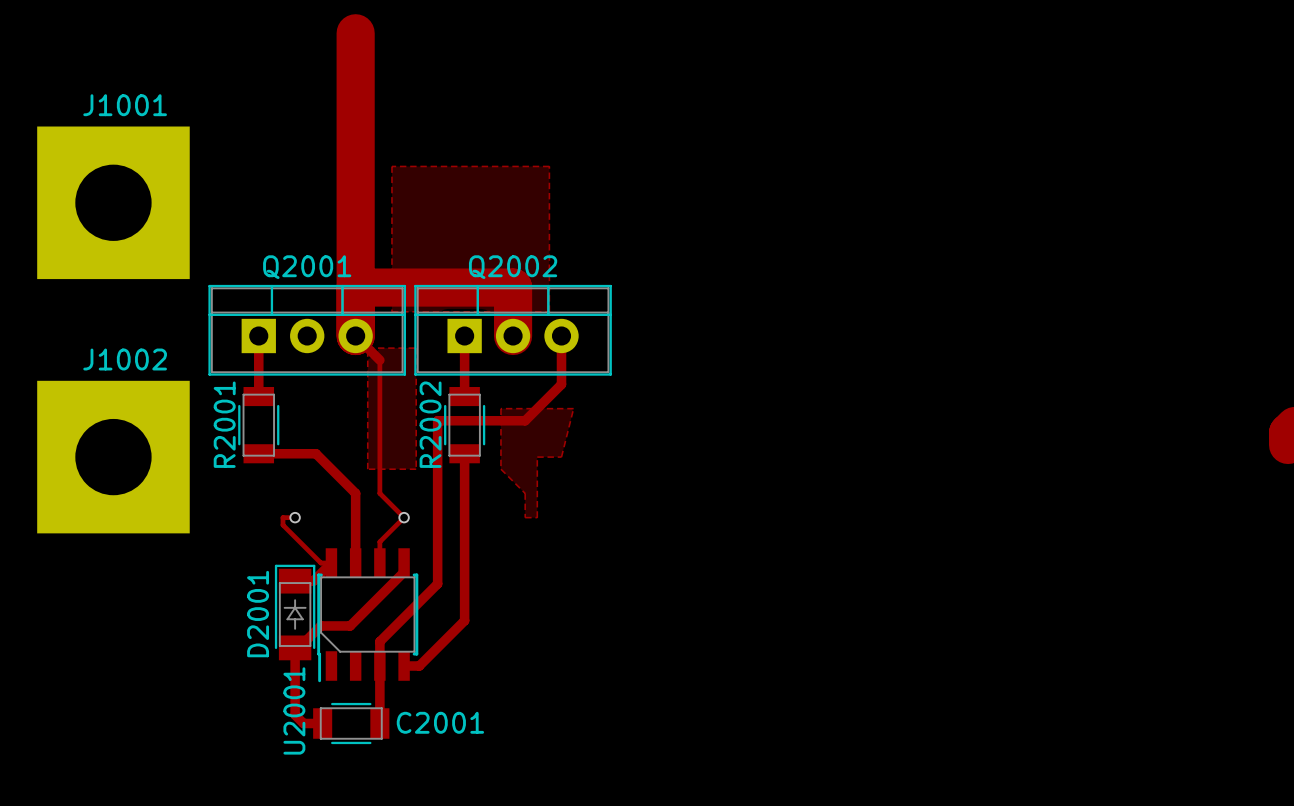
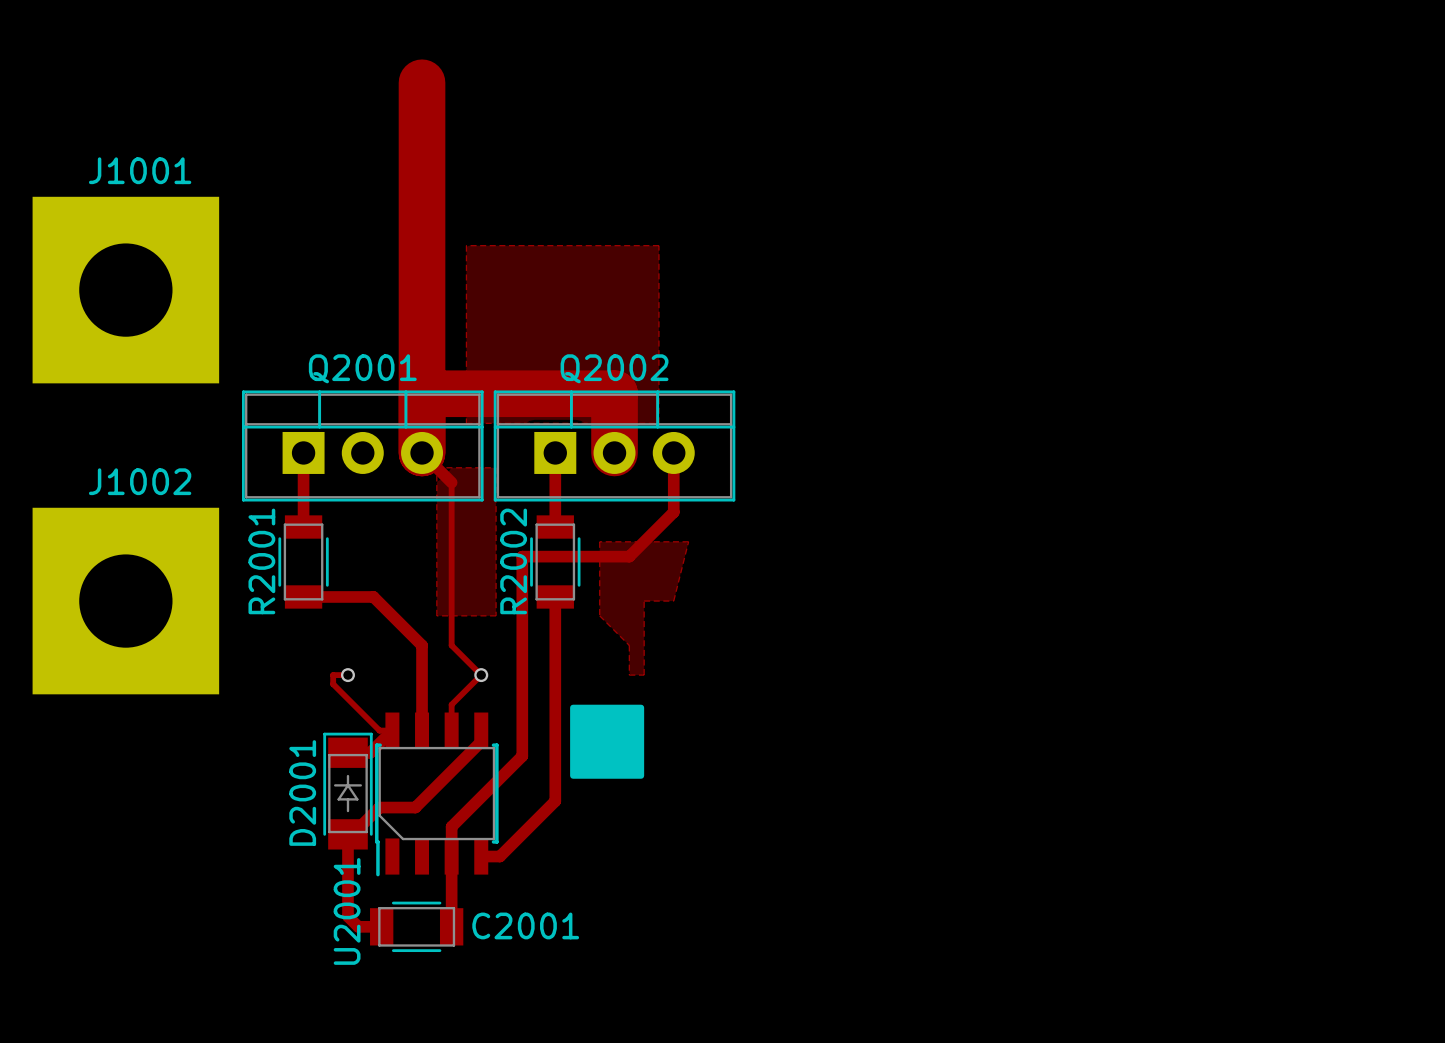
drawing: none -> [570, 704, 645, 779]

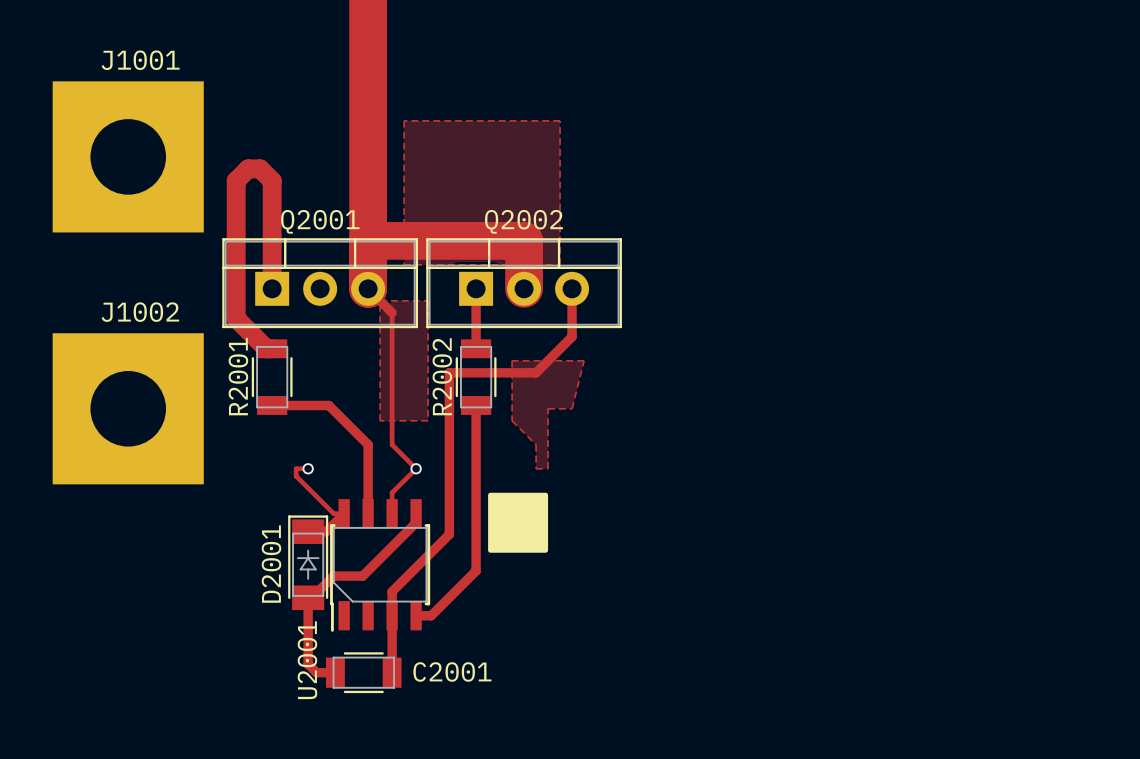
track: (303, 452) (303, 527) -> (272, 288) (272, 180) (260, 168) (248, 168) (236, 180) (236, 318) (266, 348) (272, 348)

